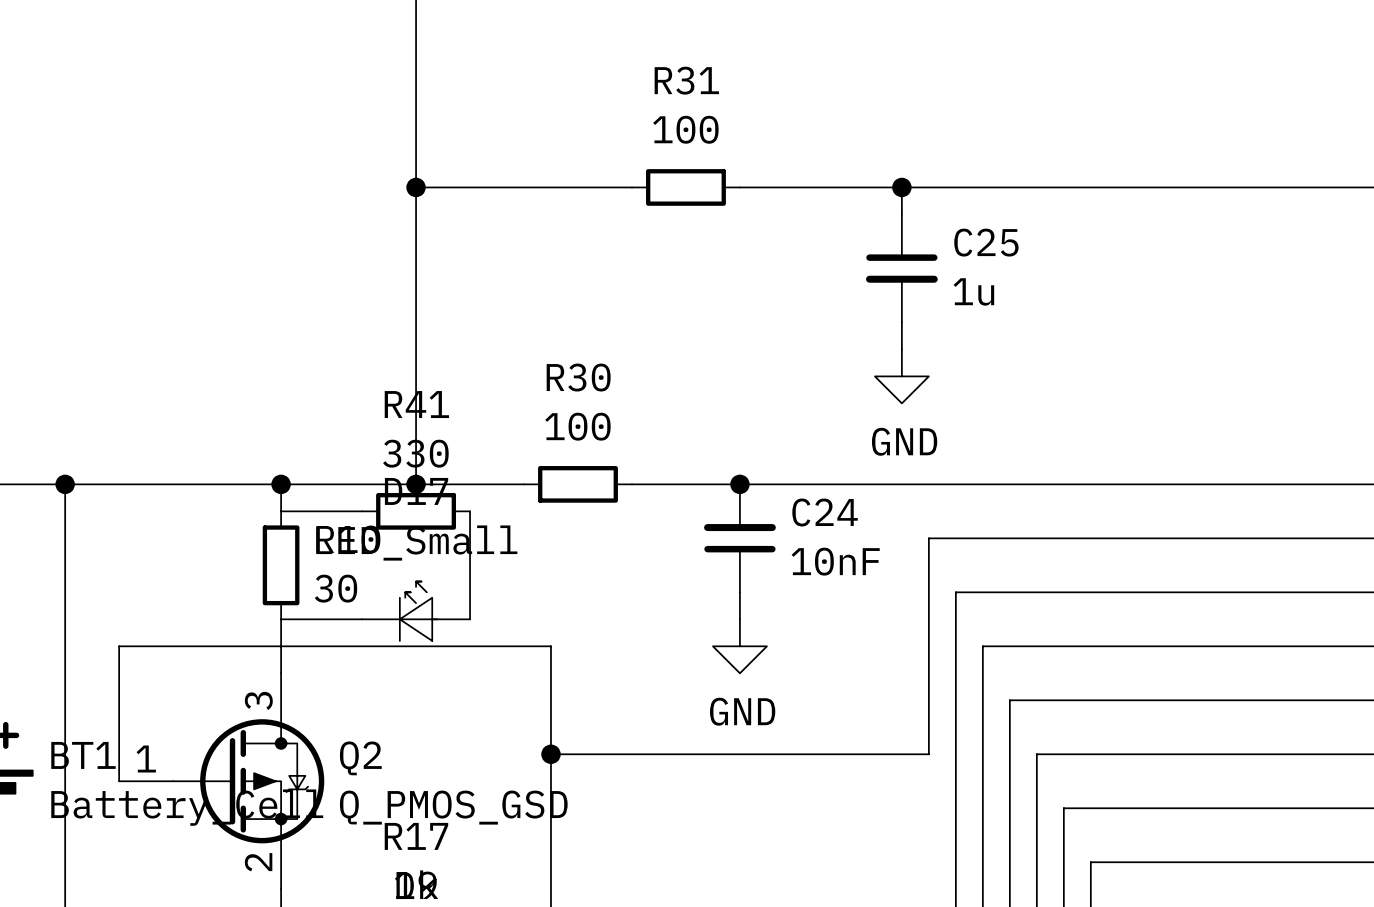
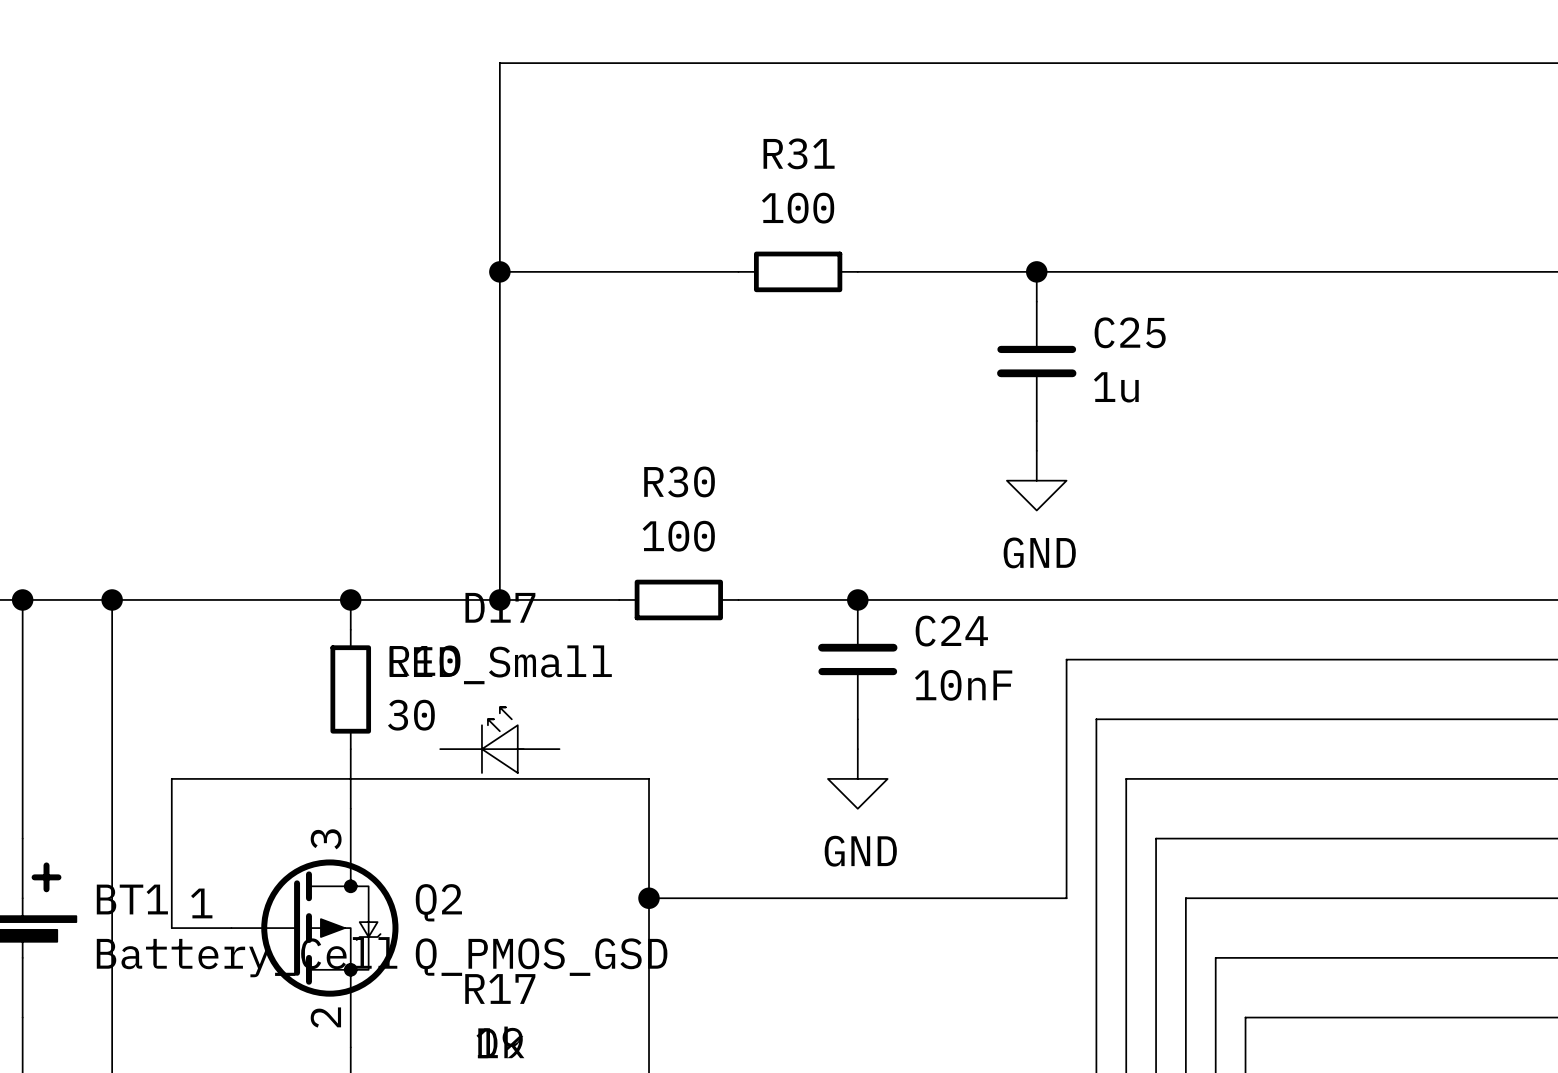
wire: (281, 511) (362, 511) -> none
R41: 330 (416, 511) -> none
wire: (470, 511) (470, 619) -> none
wire: (281, 619) (362, 619) -> none

